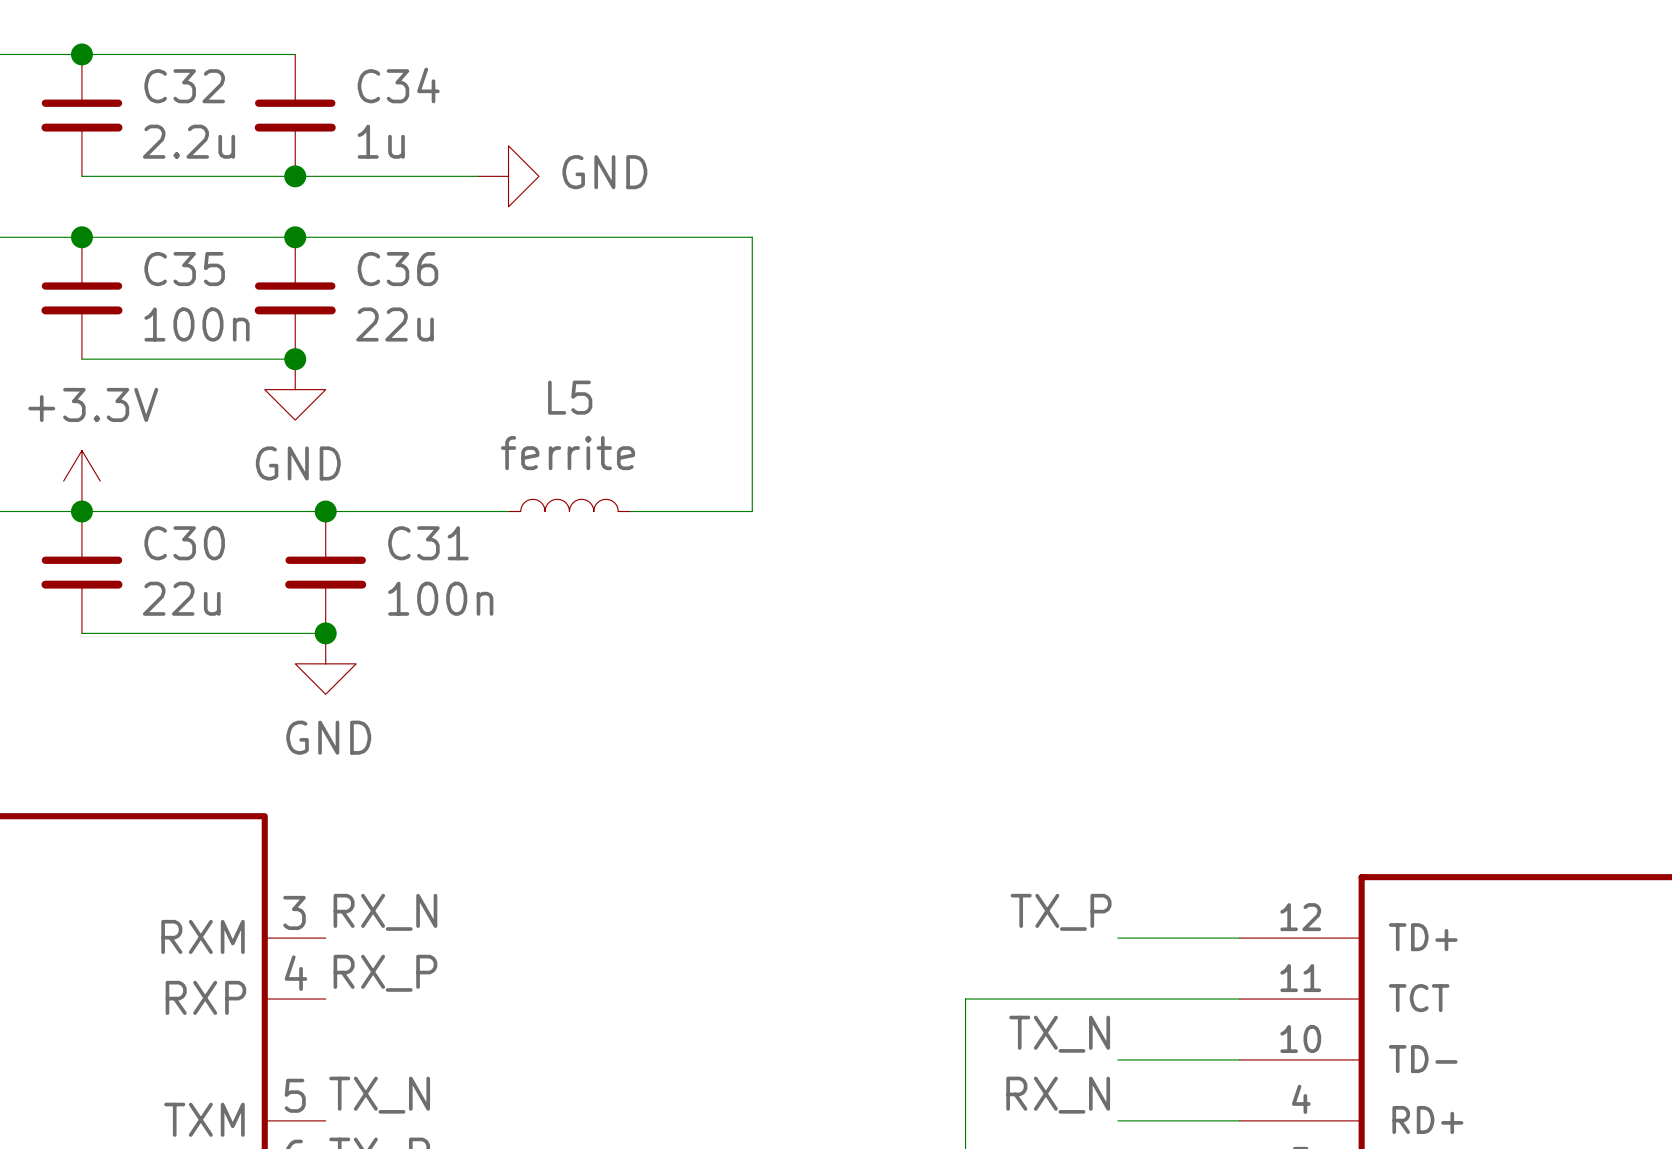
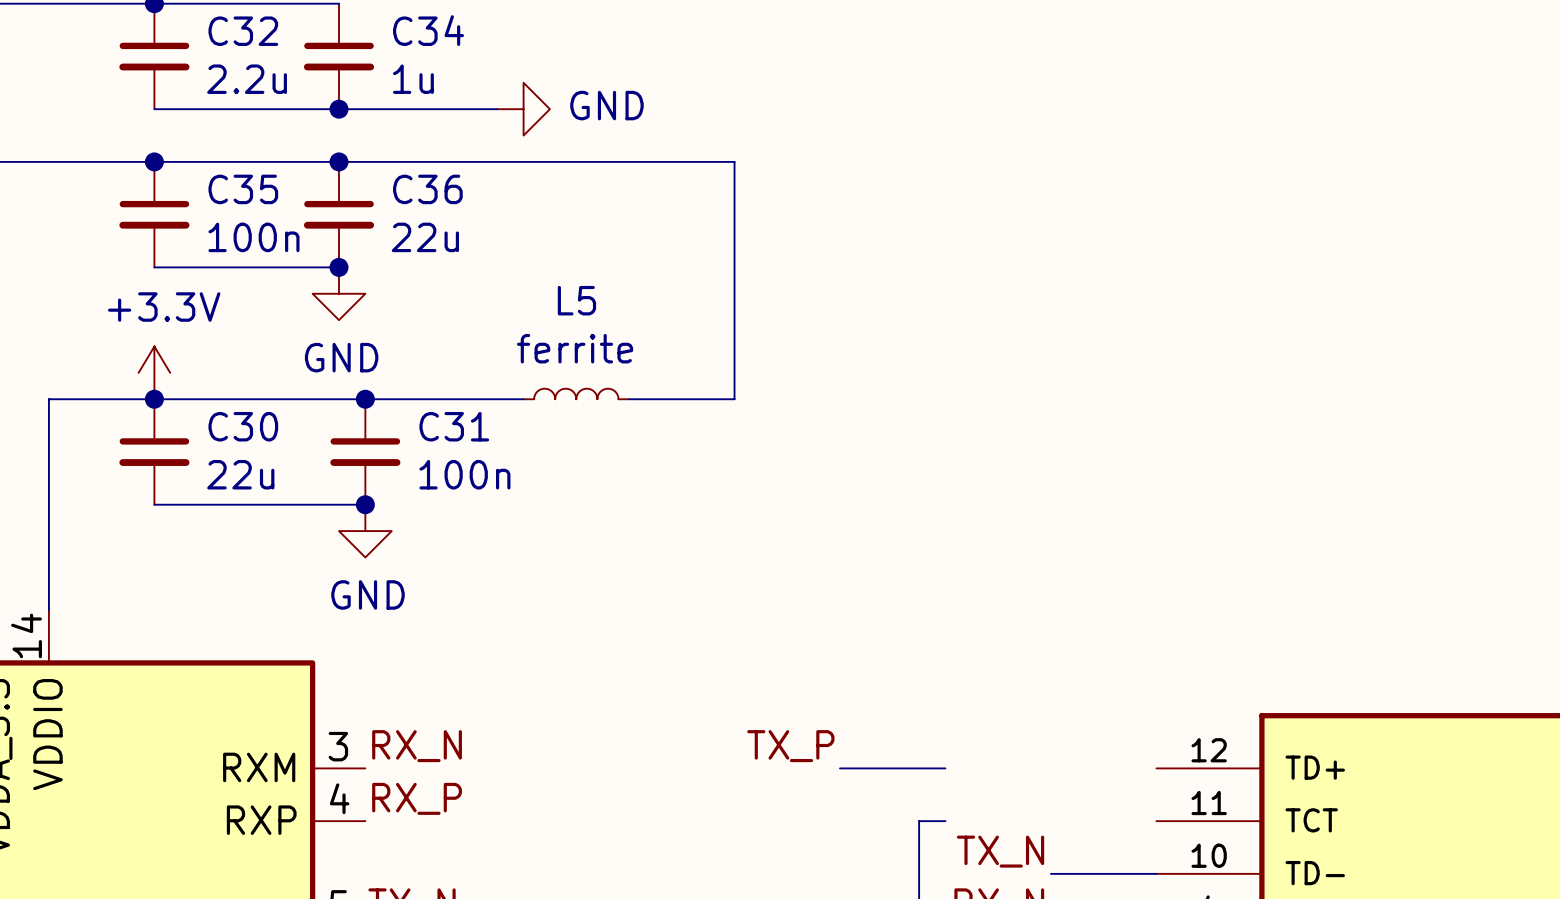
label position: TX_P (1061, 912) -> TX_P (790, 746)
wire: (1117, 938) (1239, 938) -> (840, 768) (945, 768)
wire: (996, 999) (1239, 999) -> none

